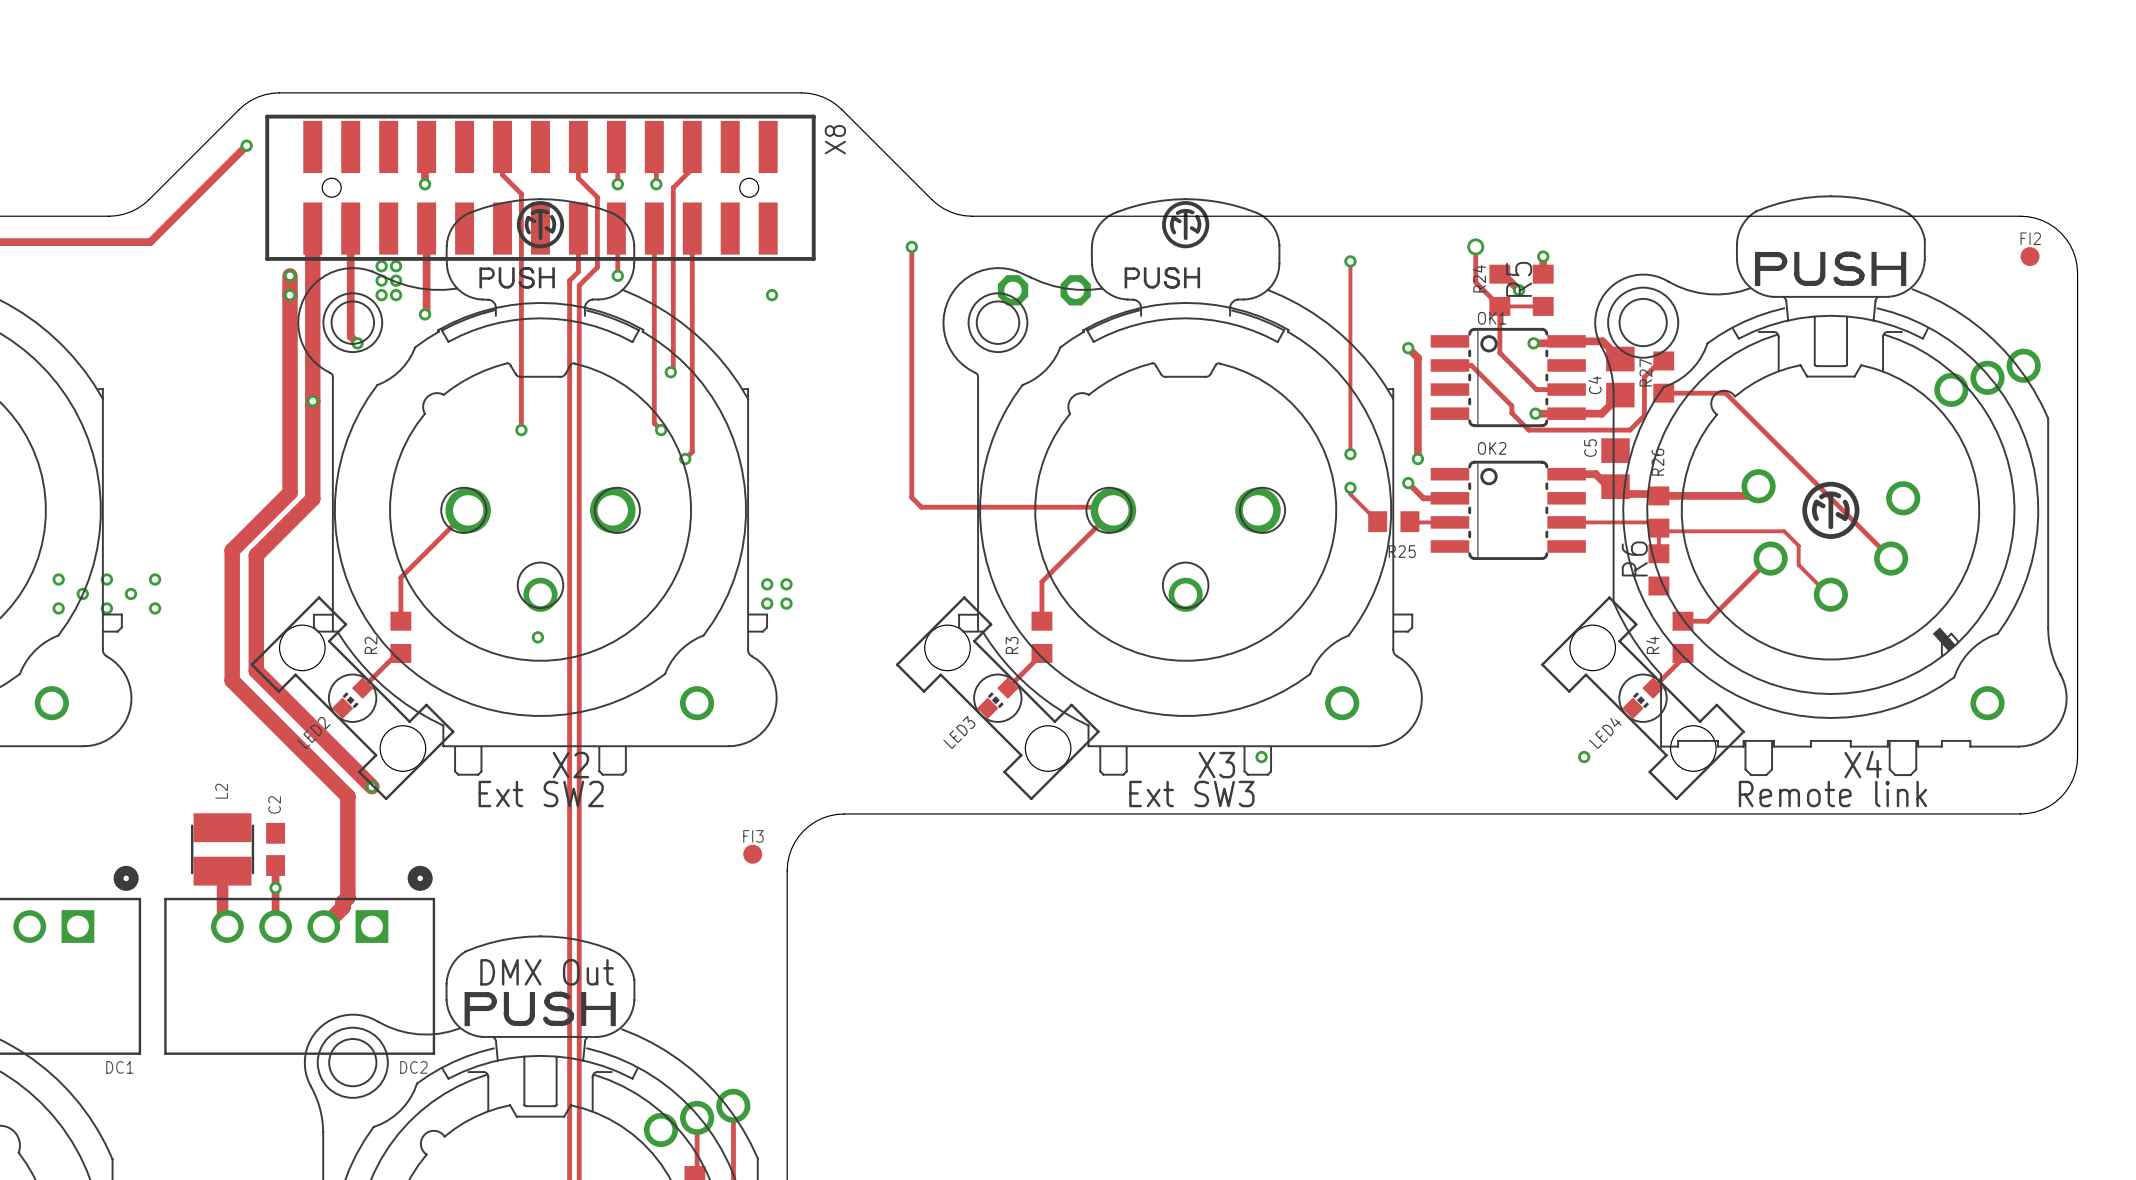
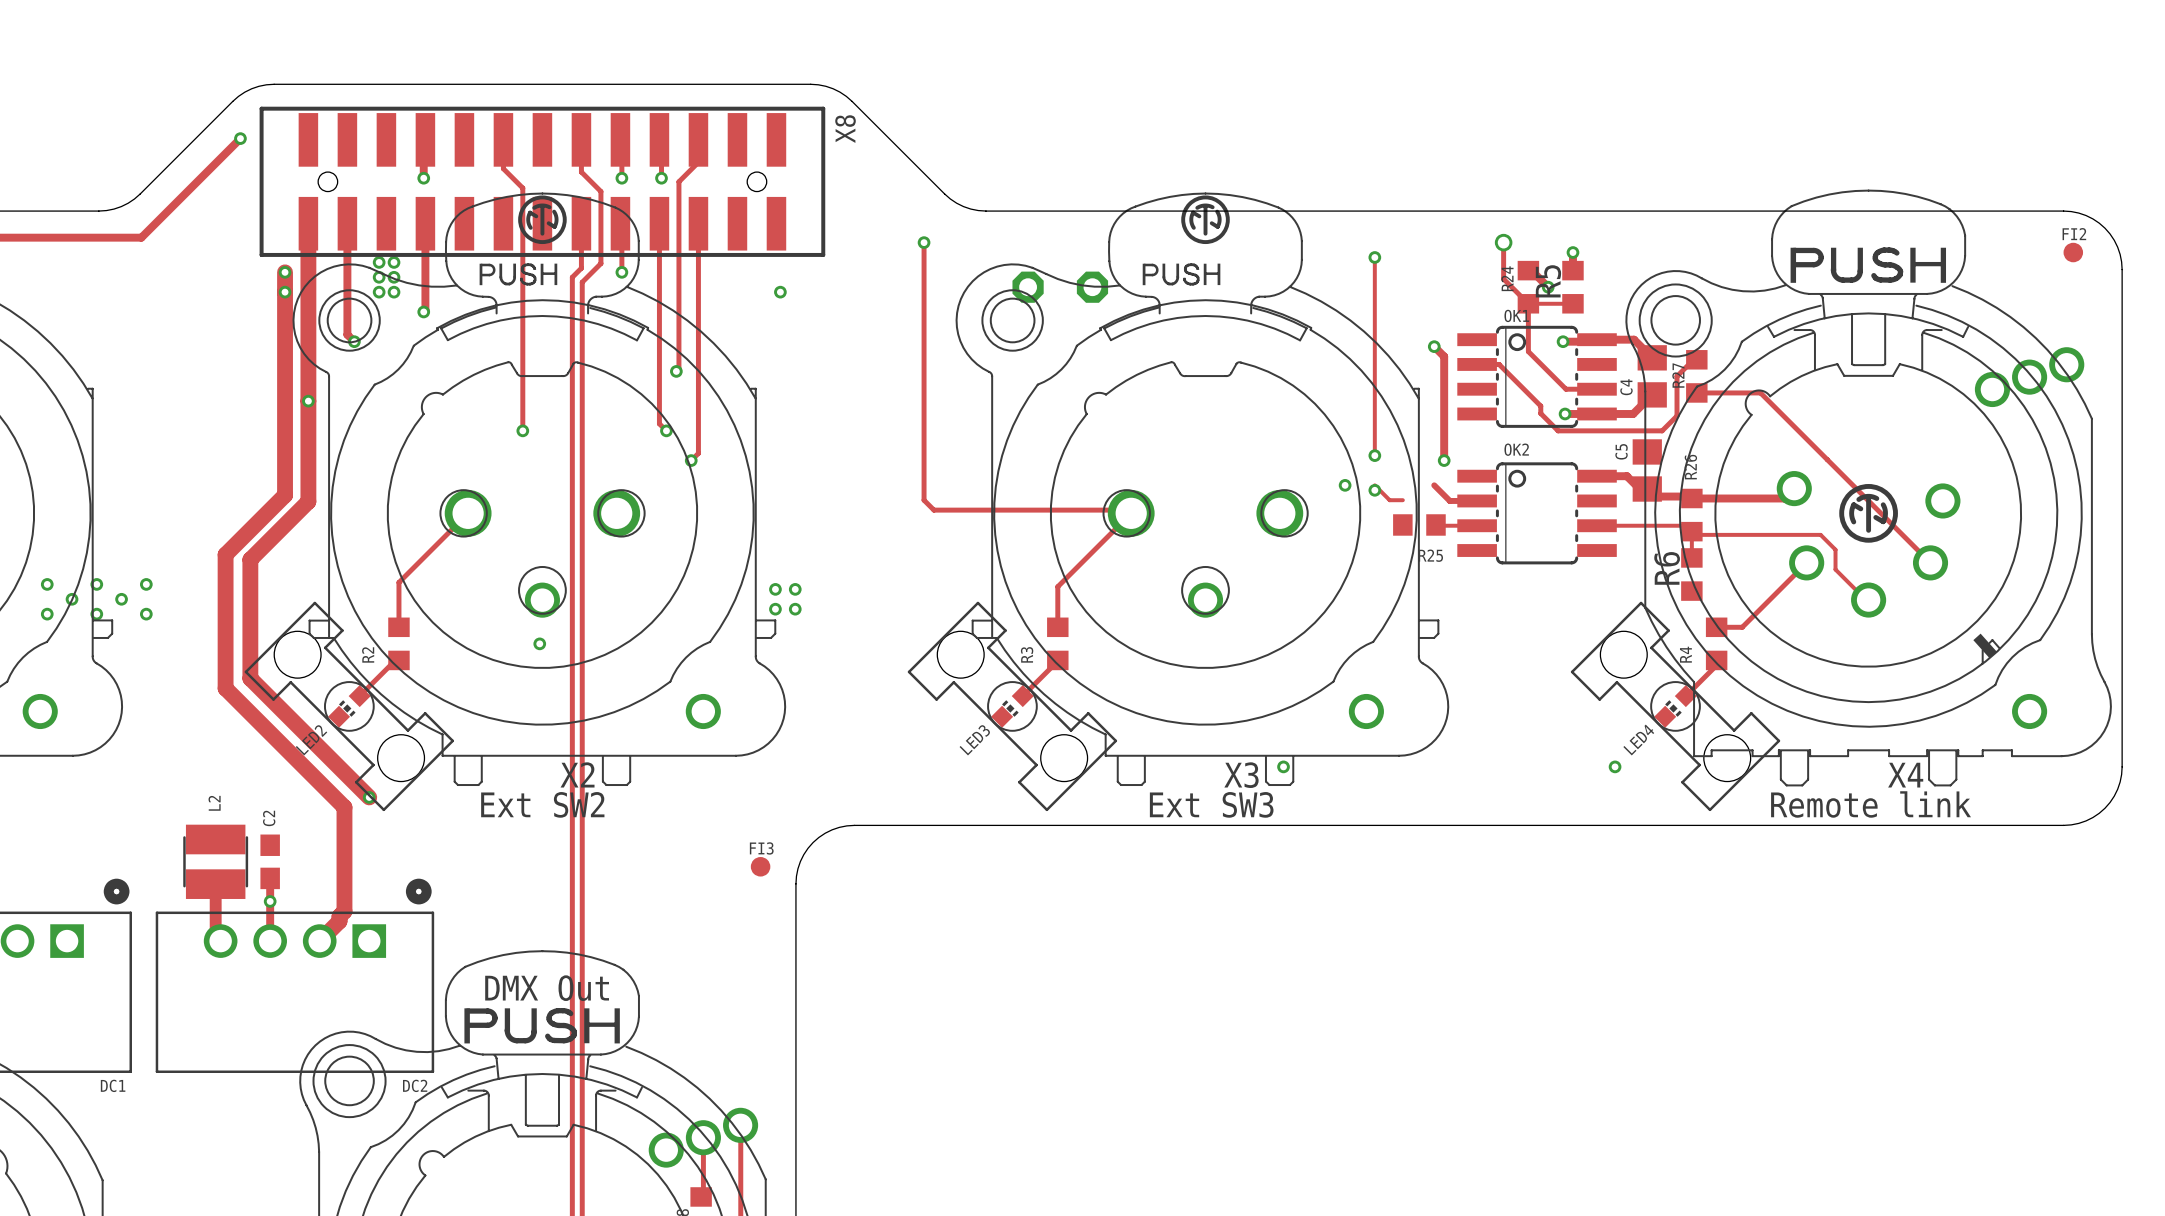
track: none -> (1374, 485) (1389, 500) (1402, 500)
via position: (1408, 483) -> (1345, 485)
track: (1350, 487) (1350, 494) (1377, 521) -> none

